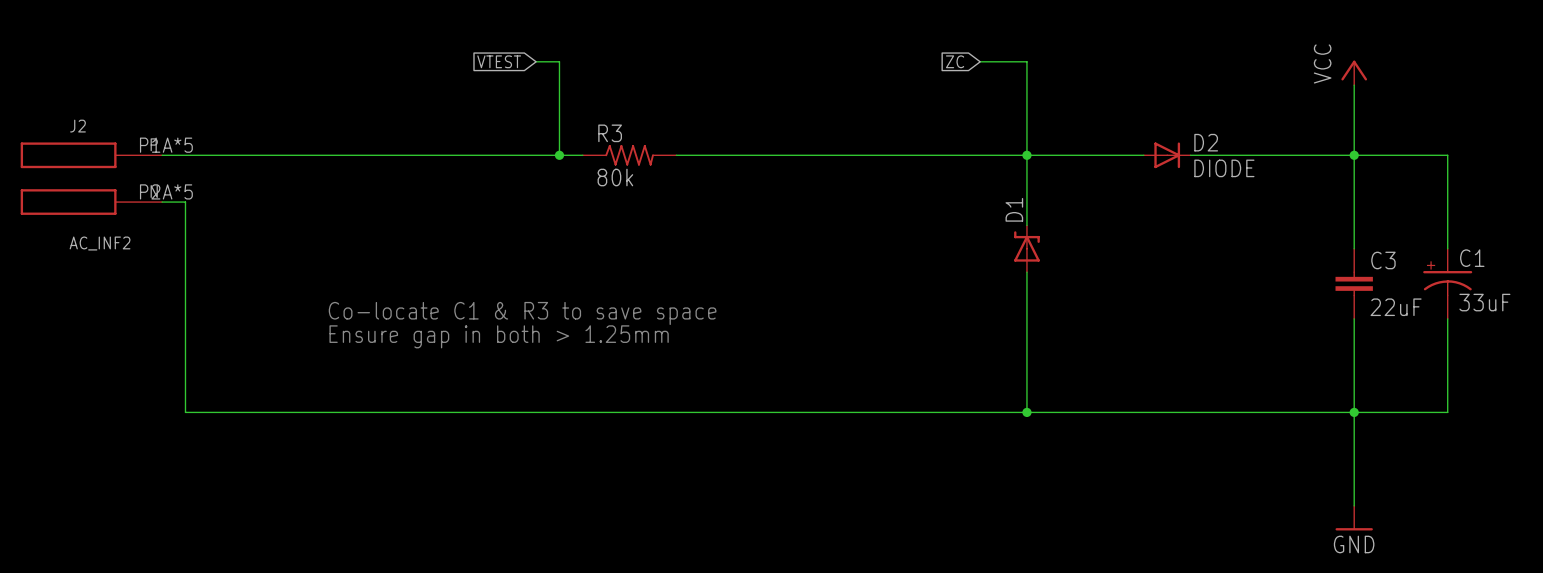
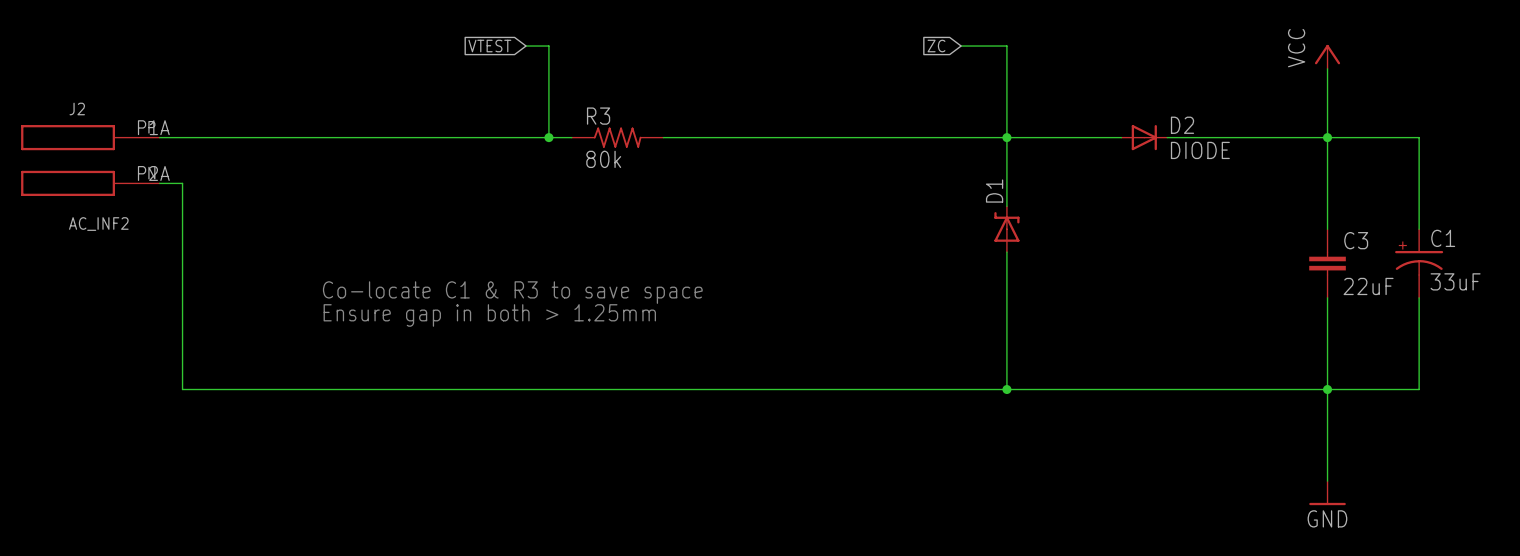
J2 pin number: P1A*5 (166, 145) -> P1A (153, 127)
J2 pin number: P2A*5 (166, 191) -> P2A (153, 173)

